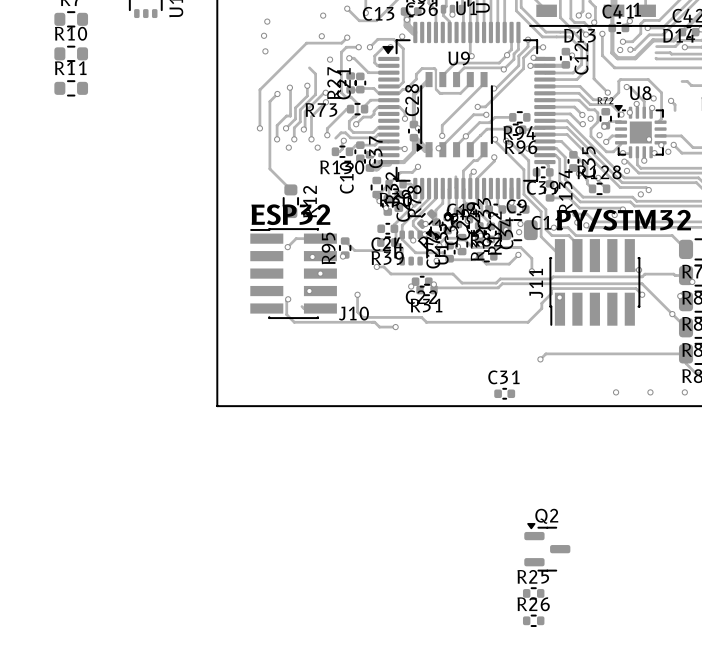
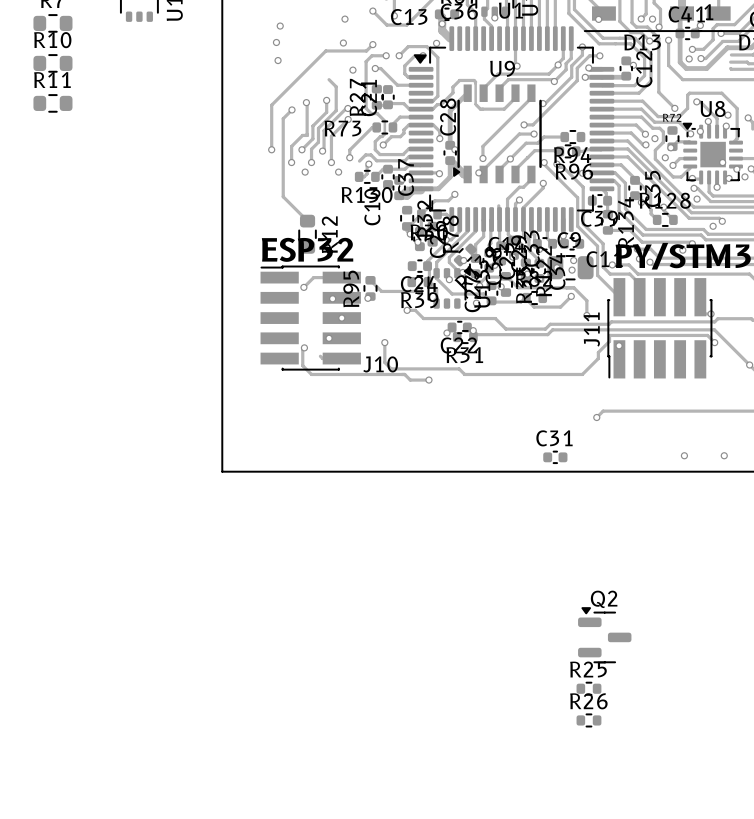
via: none -> (598, 19)

